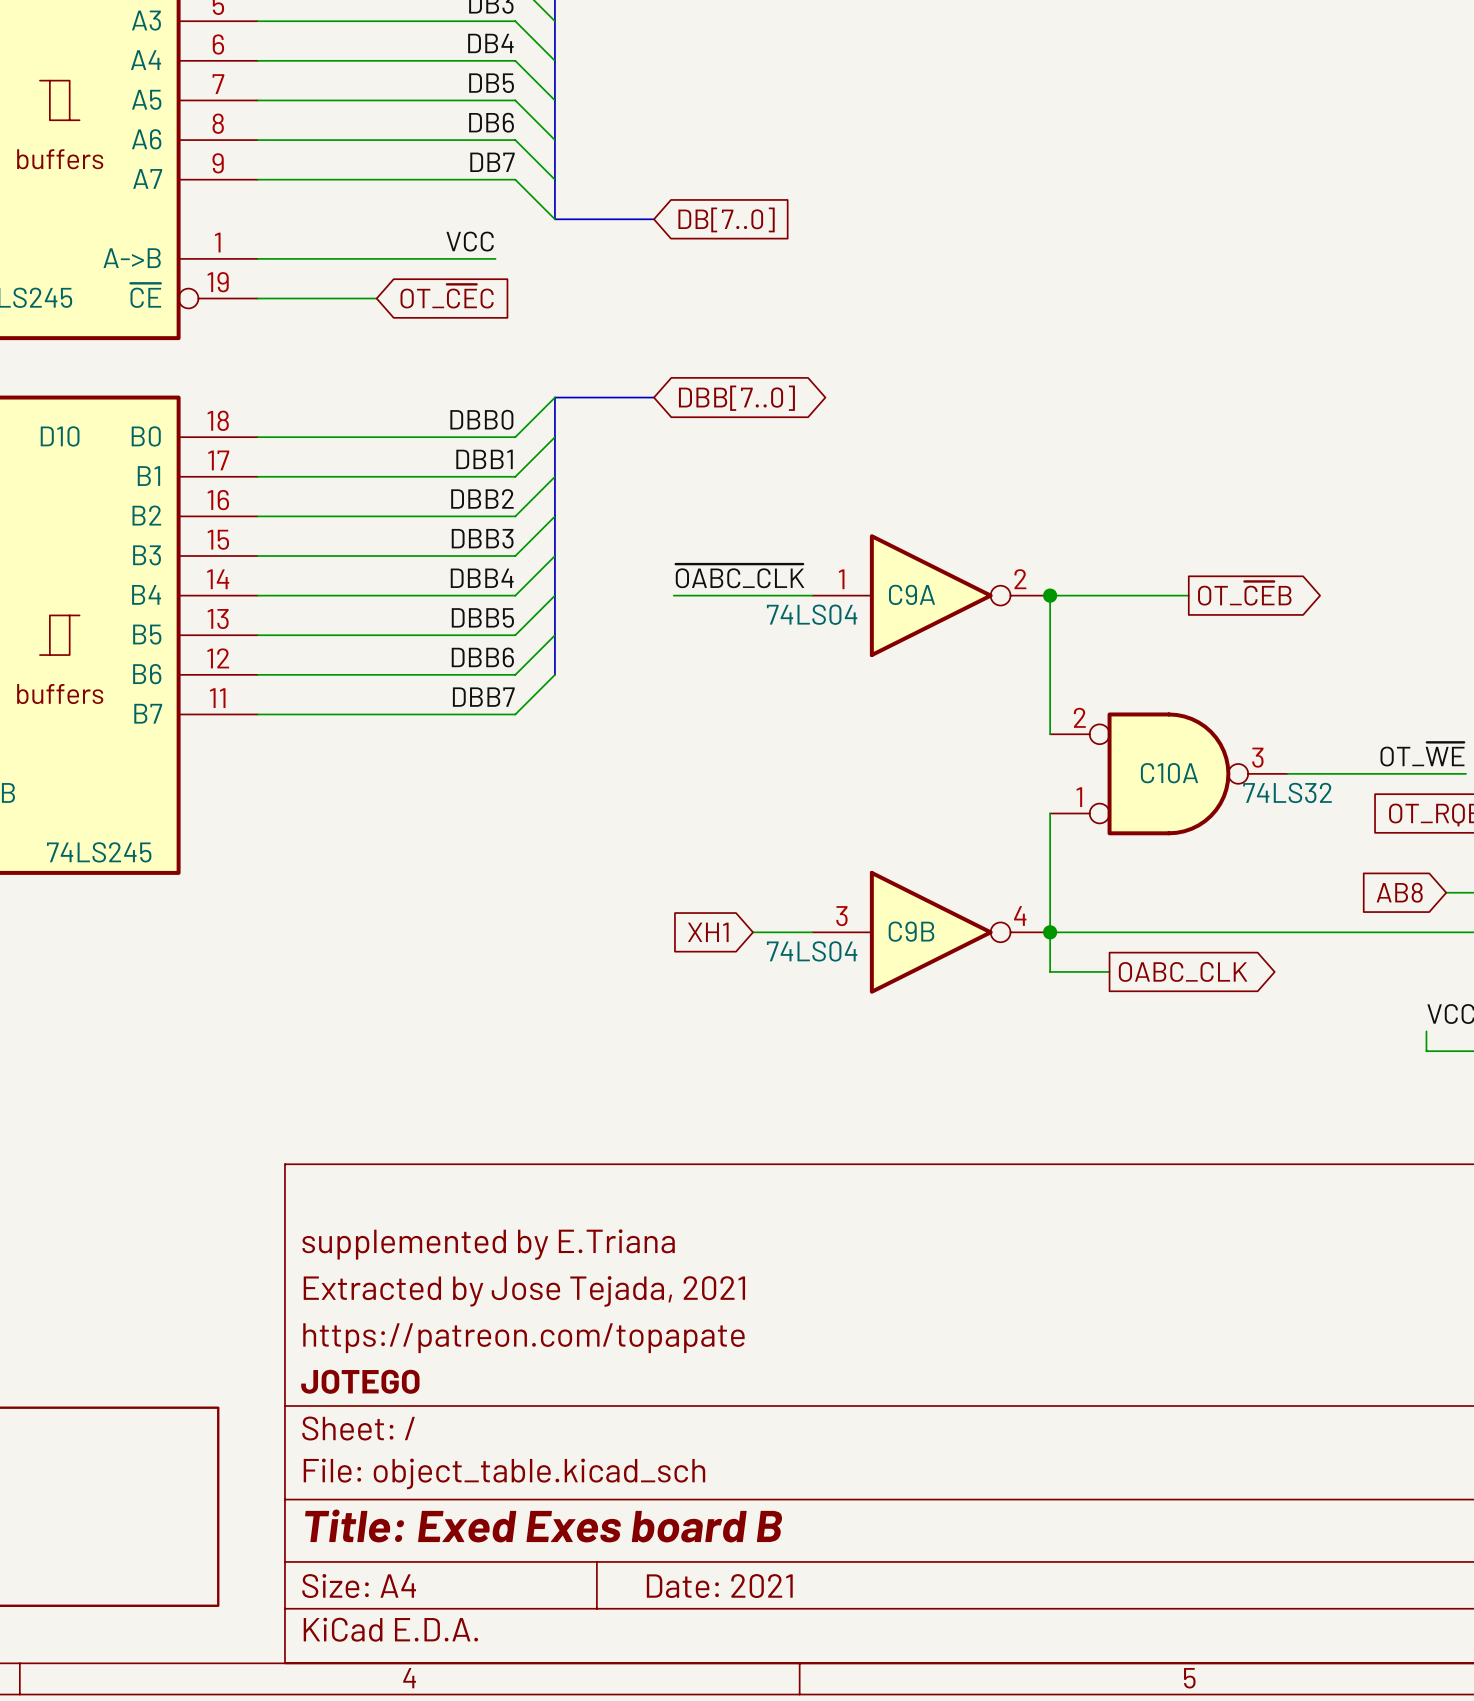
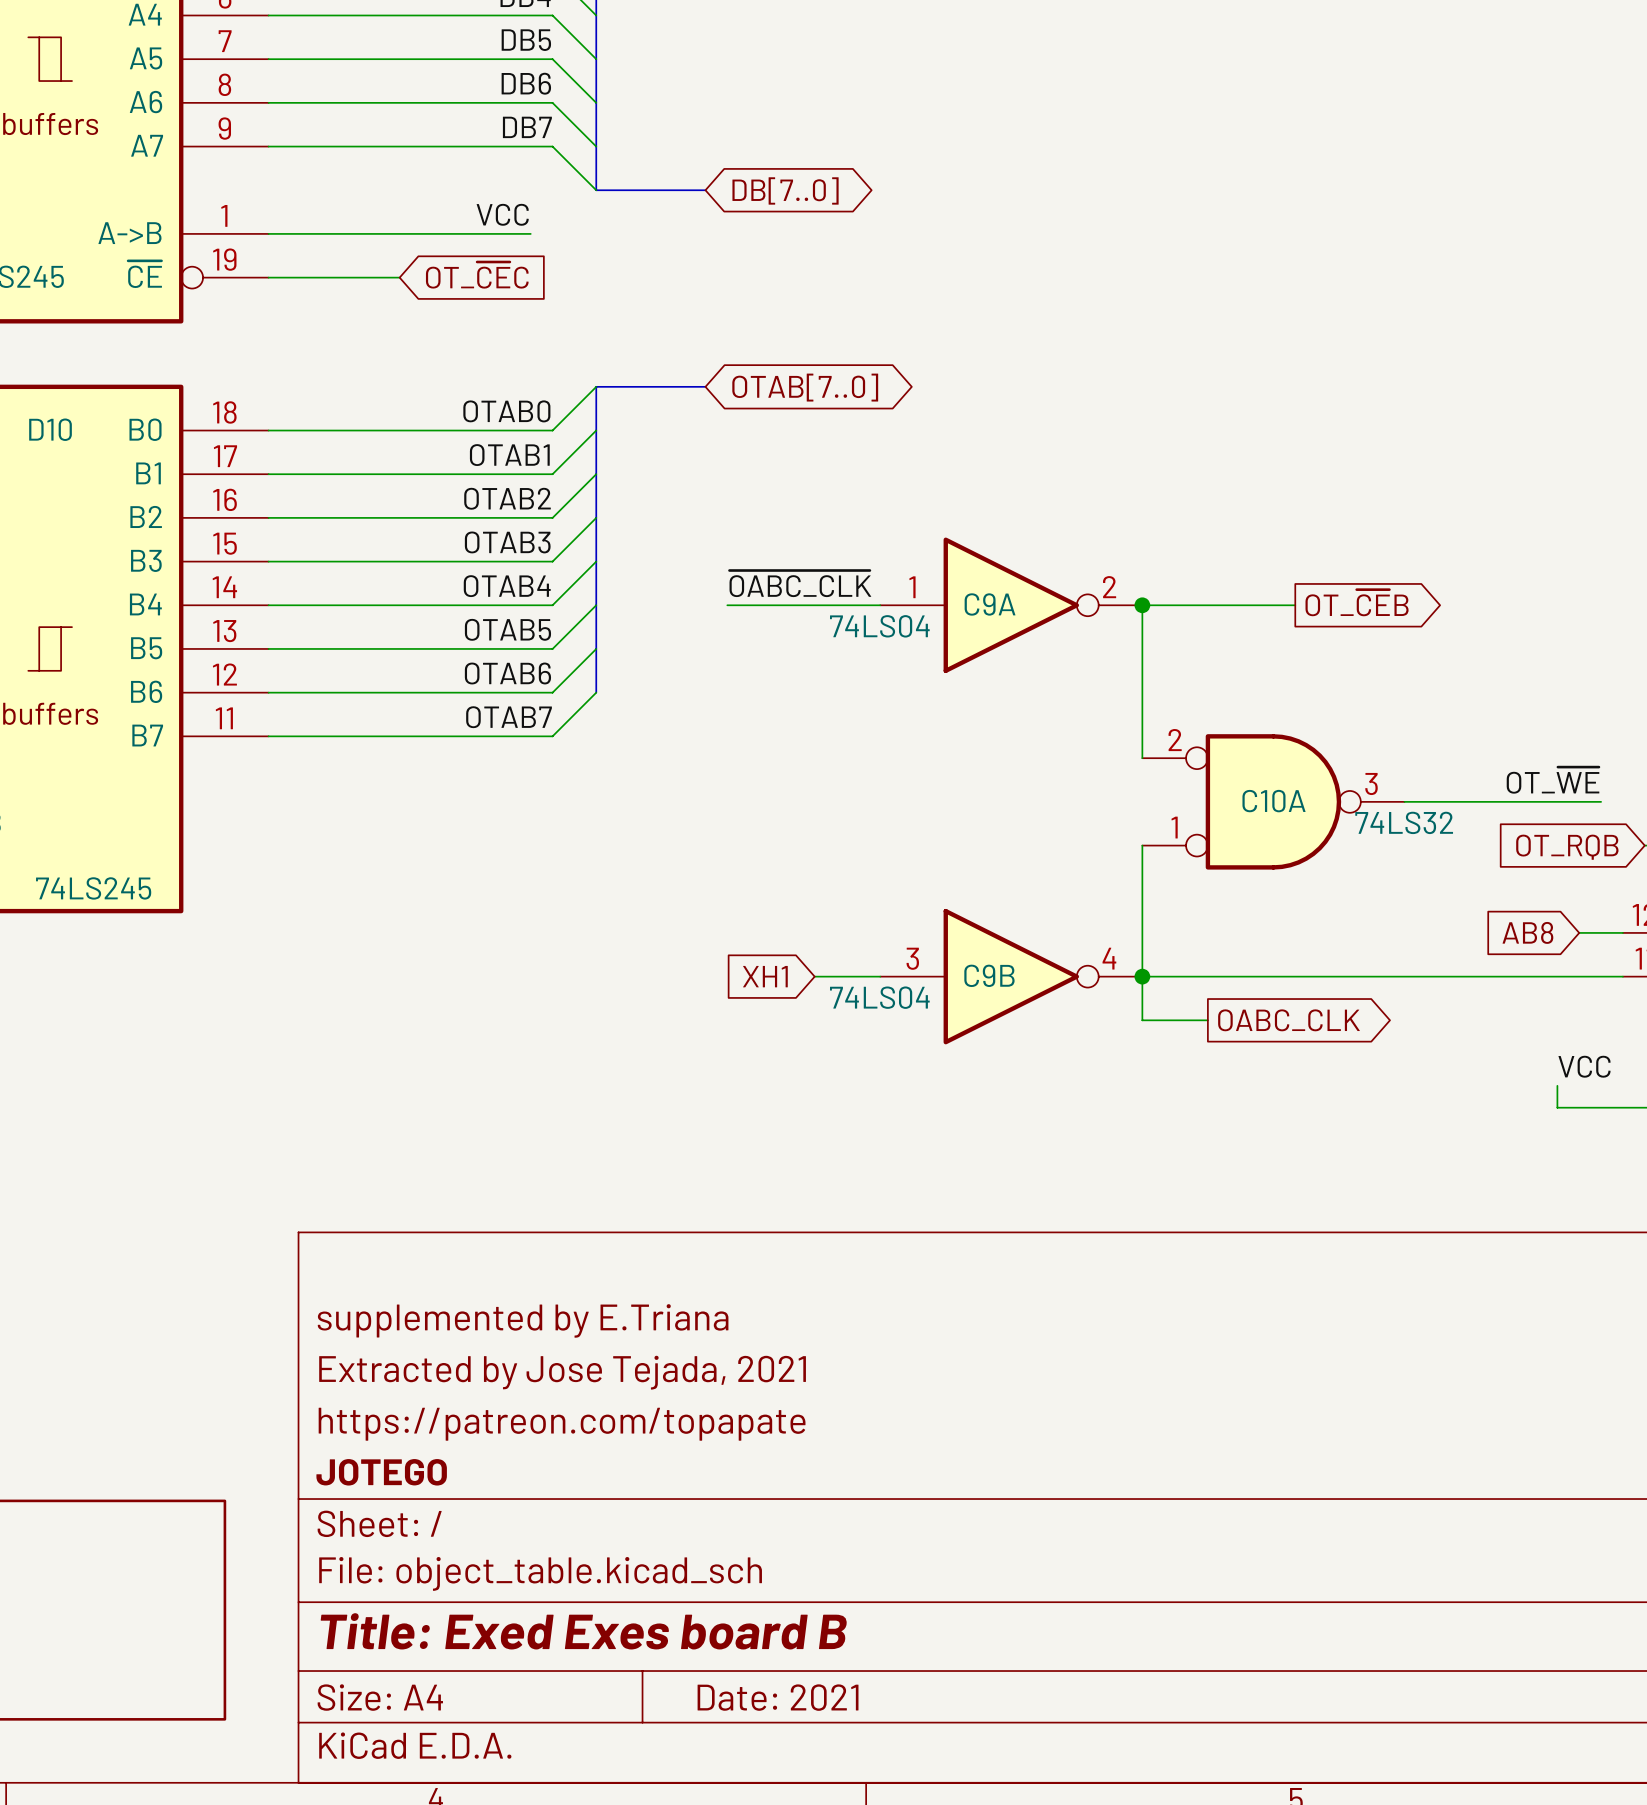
global label shape: input (726, 219) -> bidirectional (785, 190)
global label: DBB[7..0] (736, 398) -> OTAB[7..0] (805, 387)
label: DBB0 (481, 419) -> OTAB0 (506, 411)
label: DBB1 (484, 459) -> OTAB1 (509, 455)
label: DBB2 (482, 498) -> OTAB2 (507, 498)
label: DBB3 (482, 538) -> OTAB3 (507, 542)
label: DBB4 (482, 578) -> OTAB4 (507, 586)
label: DBB5 (482, 617) -> OTAB5 (507, 629)
label: DBB6 (482, 657) -> OTAB6 (507, 673)
label: DBB7 (483, 697) -> OTAB7 (509, 717)

